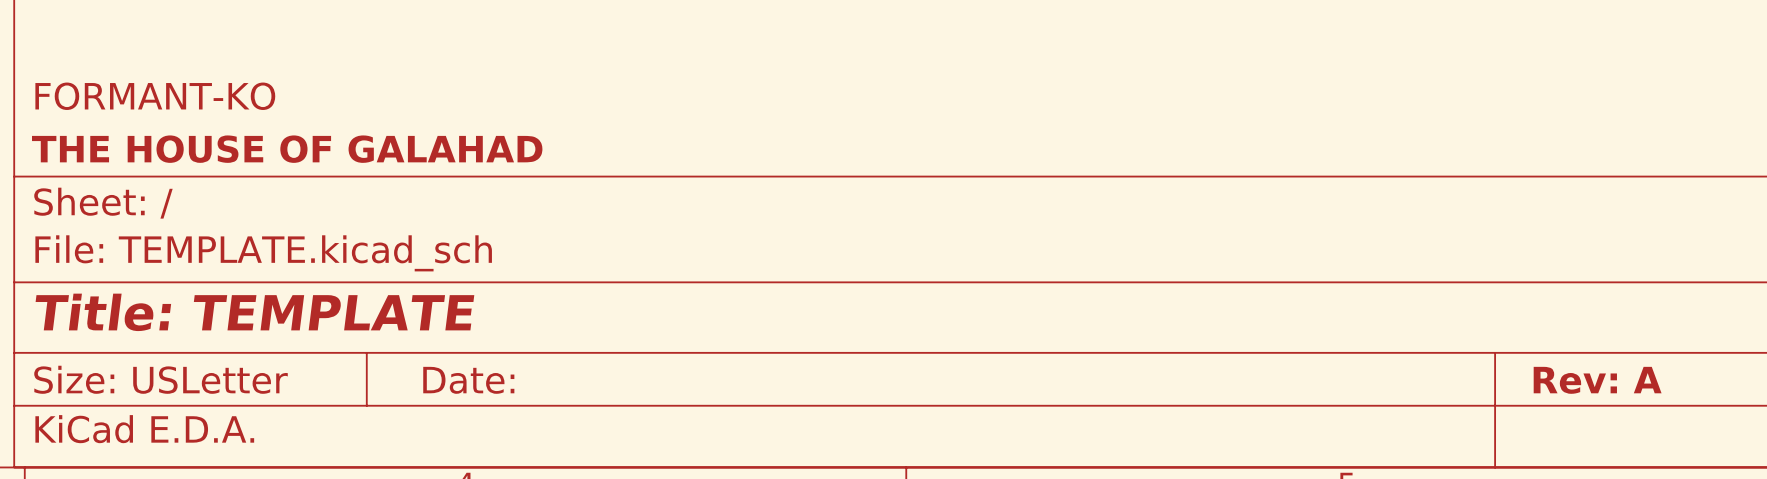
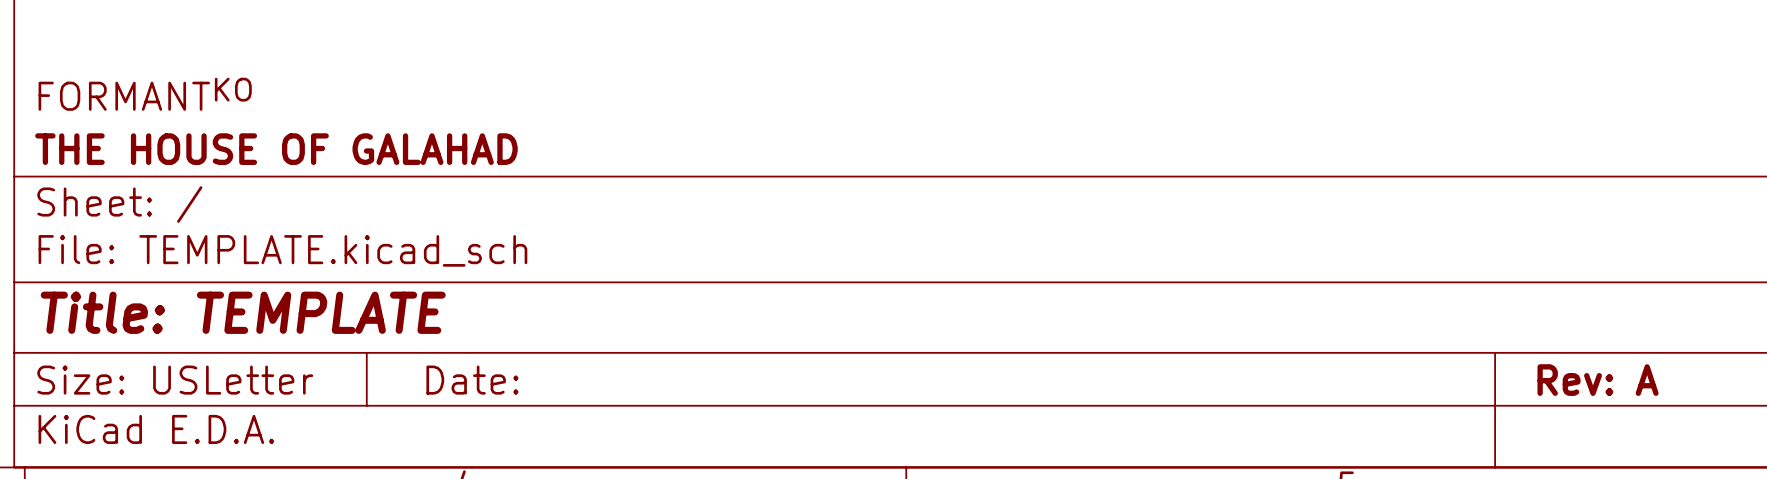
title block: FORMANT-KO (155, 96) -> FORMANTKO (145, 94)

